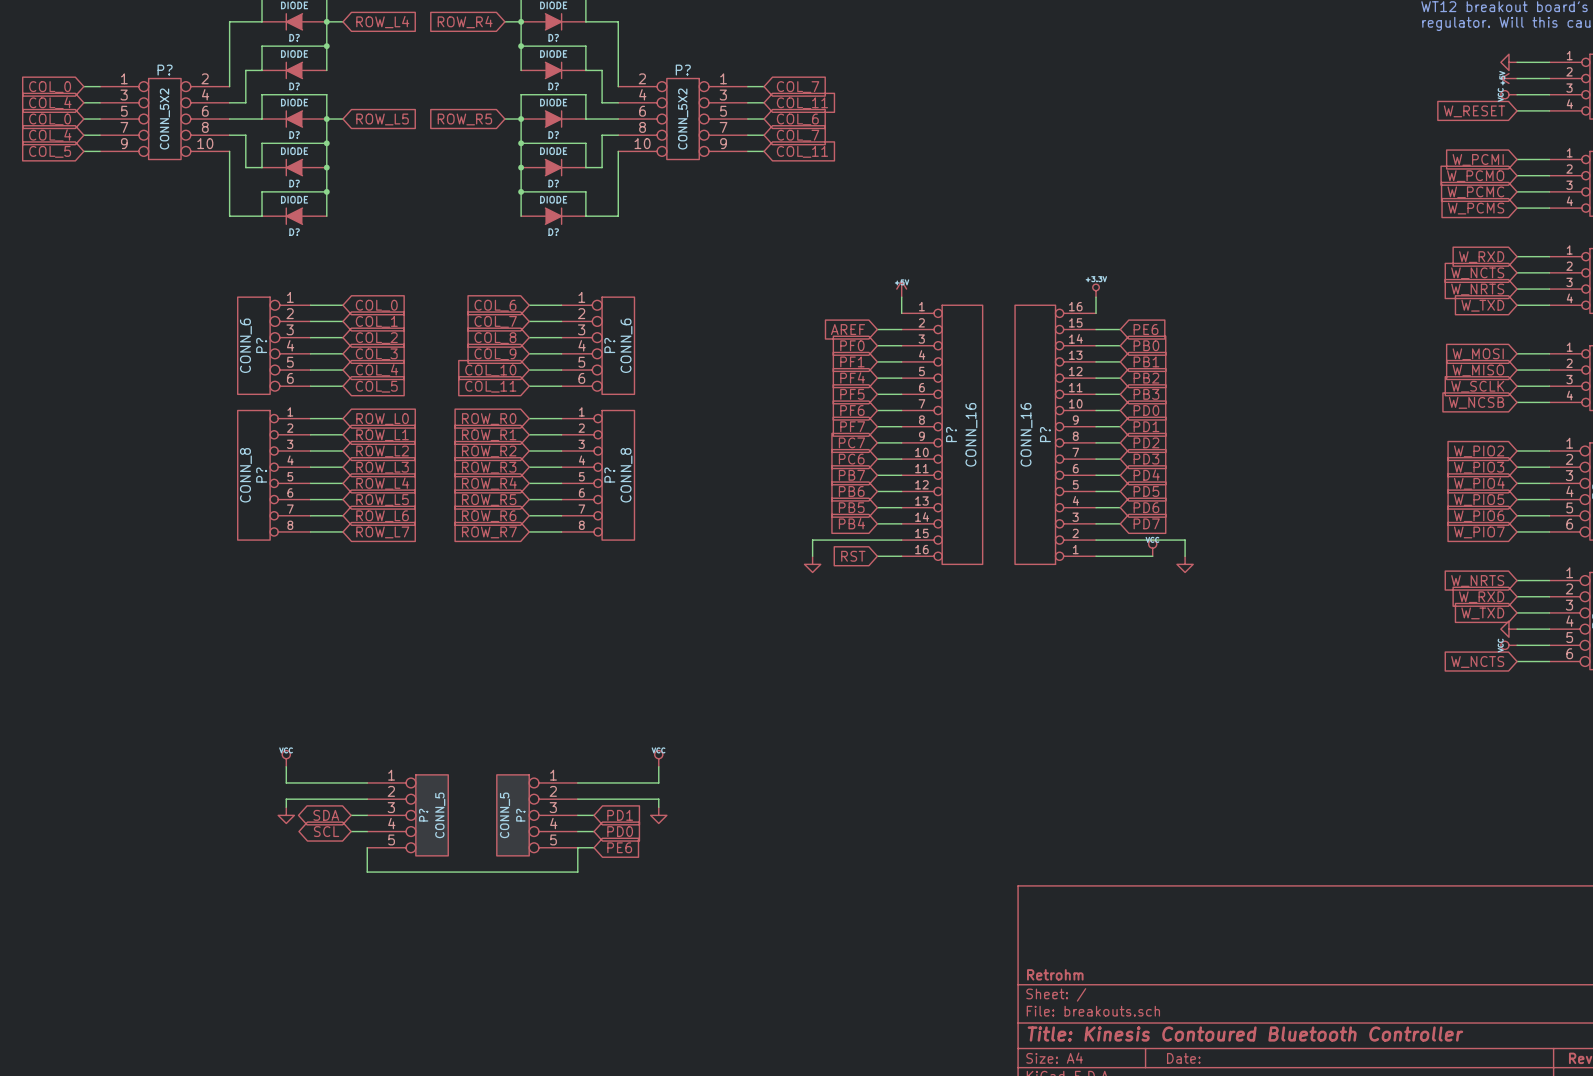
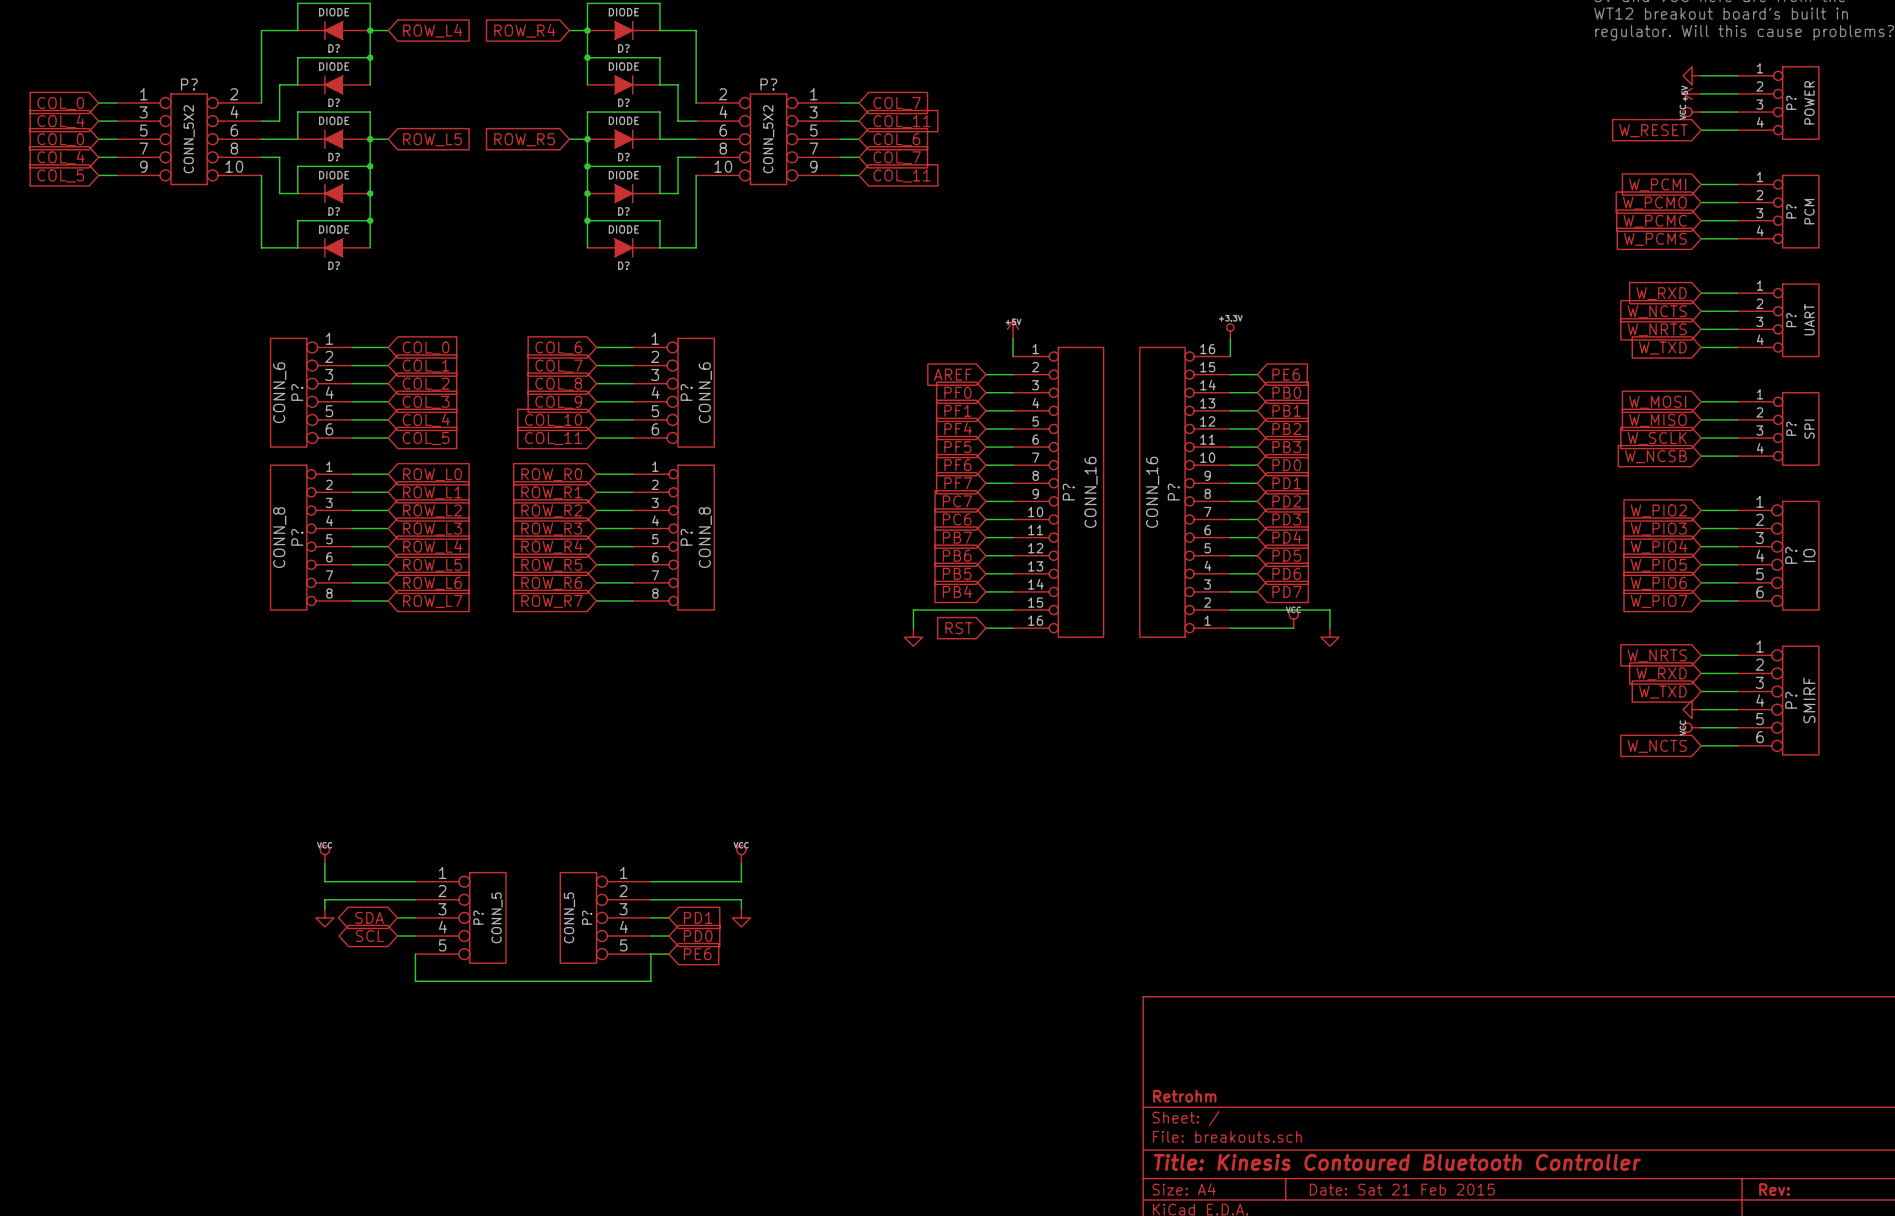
title block: Date: (1183, 1058) -> Date: Sat 21 Feb 2015 (1402, 1189)

